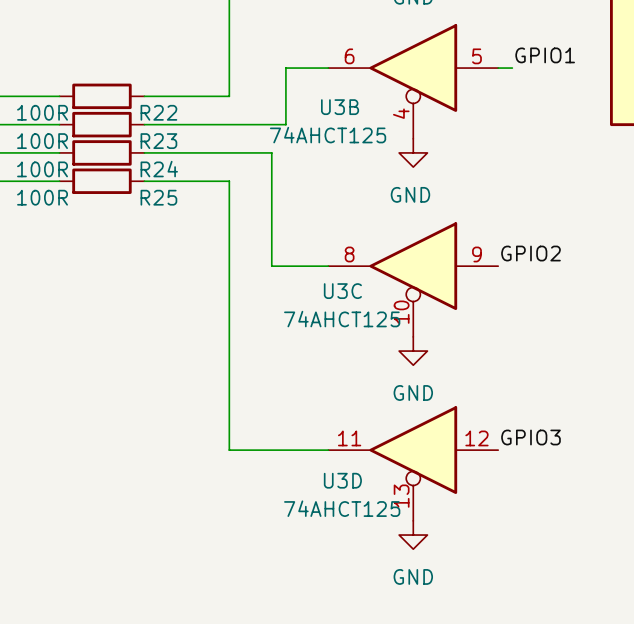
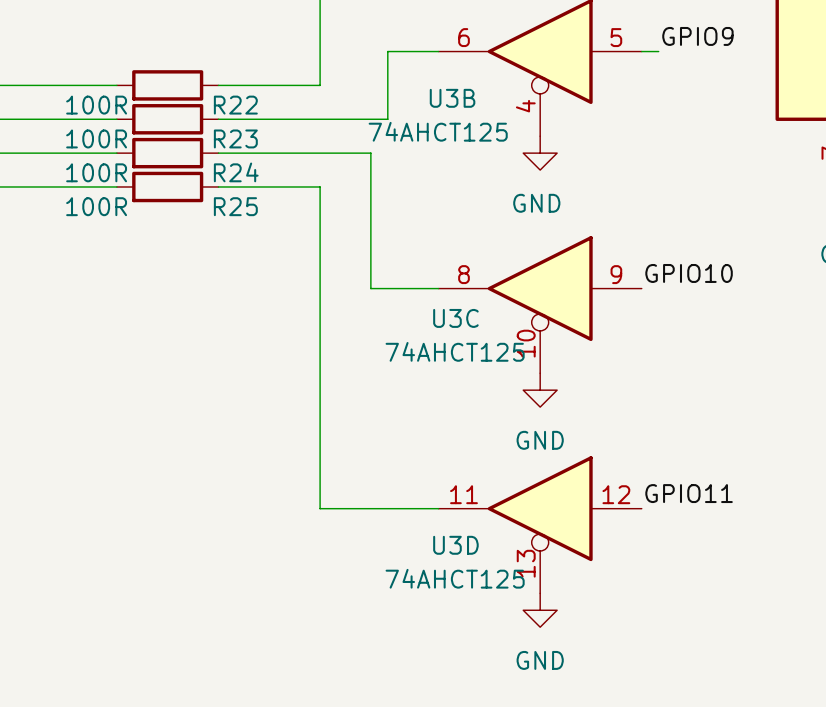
label: GPIO1 (545, 55) -> GPIO9 (697, 36)
label: GPIO2 (530, 253) -> GPIO10 (689, 273)
label: GPIO3 (530, 437) -> GPIO11 (689, 493)

